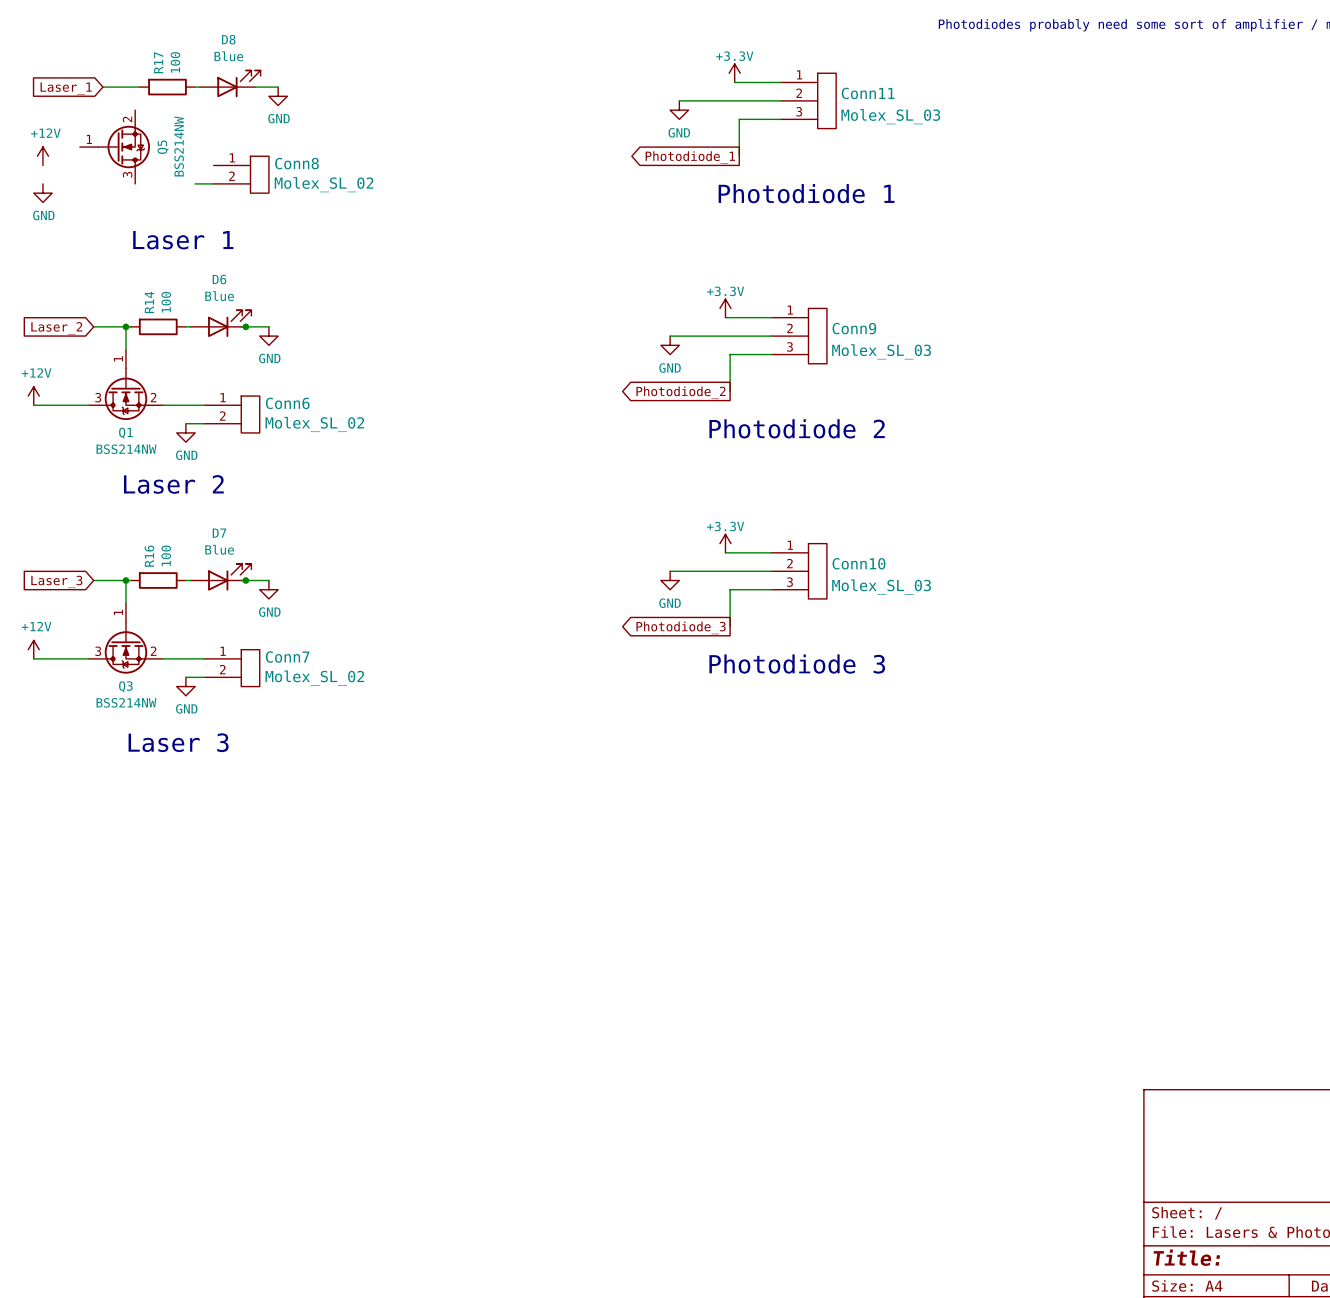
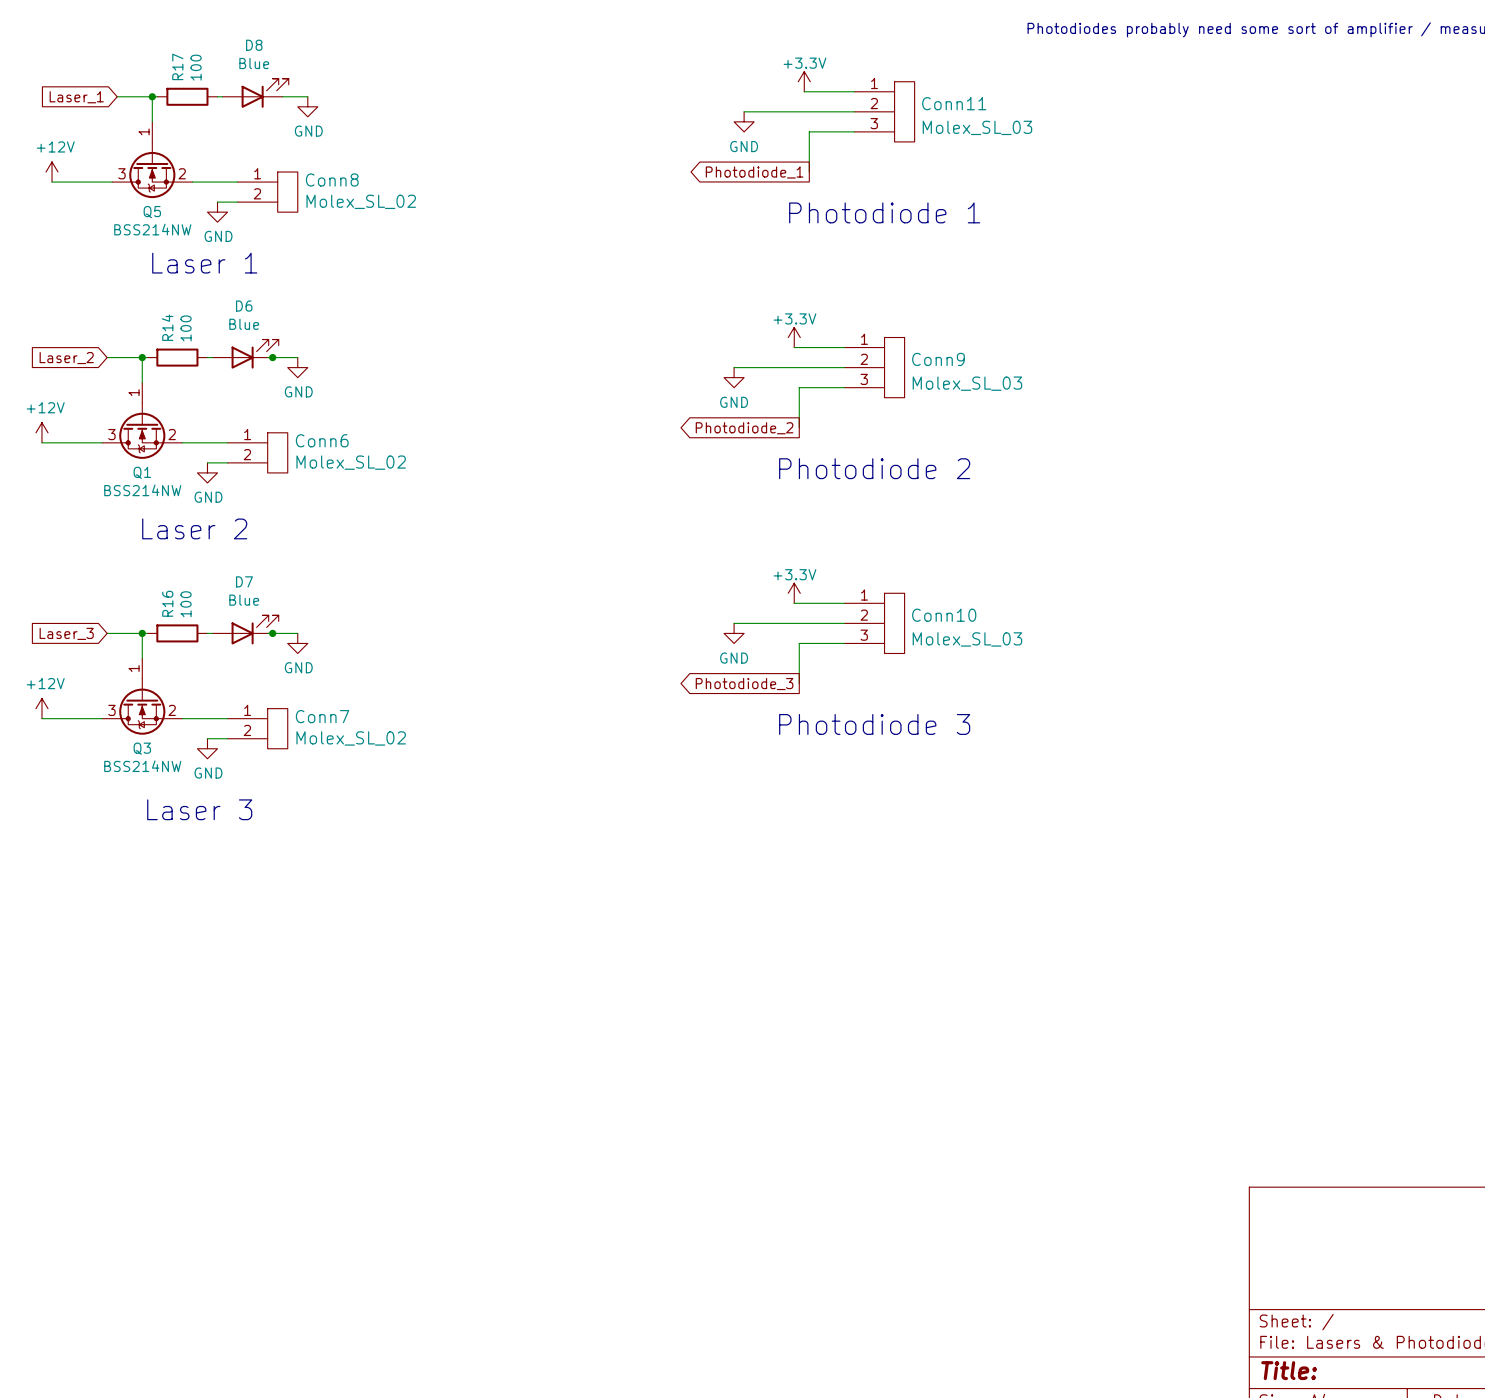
wire: none -> (152, 96) (152, 121)
junction: none -> (152, 96)
Q5 rotation: 0° (124, 147) -> 90° clockwise (152, 170)
wire: none -> (52, 182) (112, 182)
wire: none -> (192, 182) (237, 182)
power symbol position: GND (42, 193) -> GND (217, 212)

